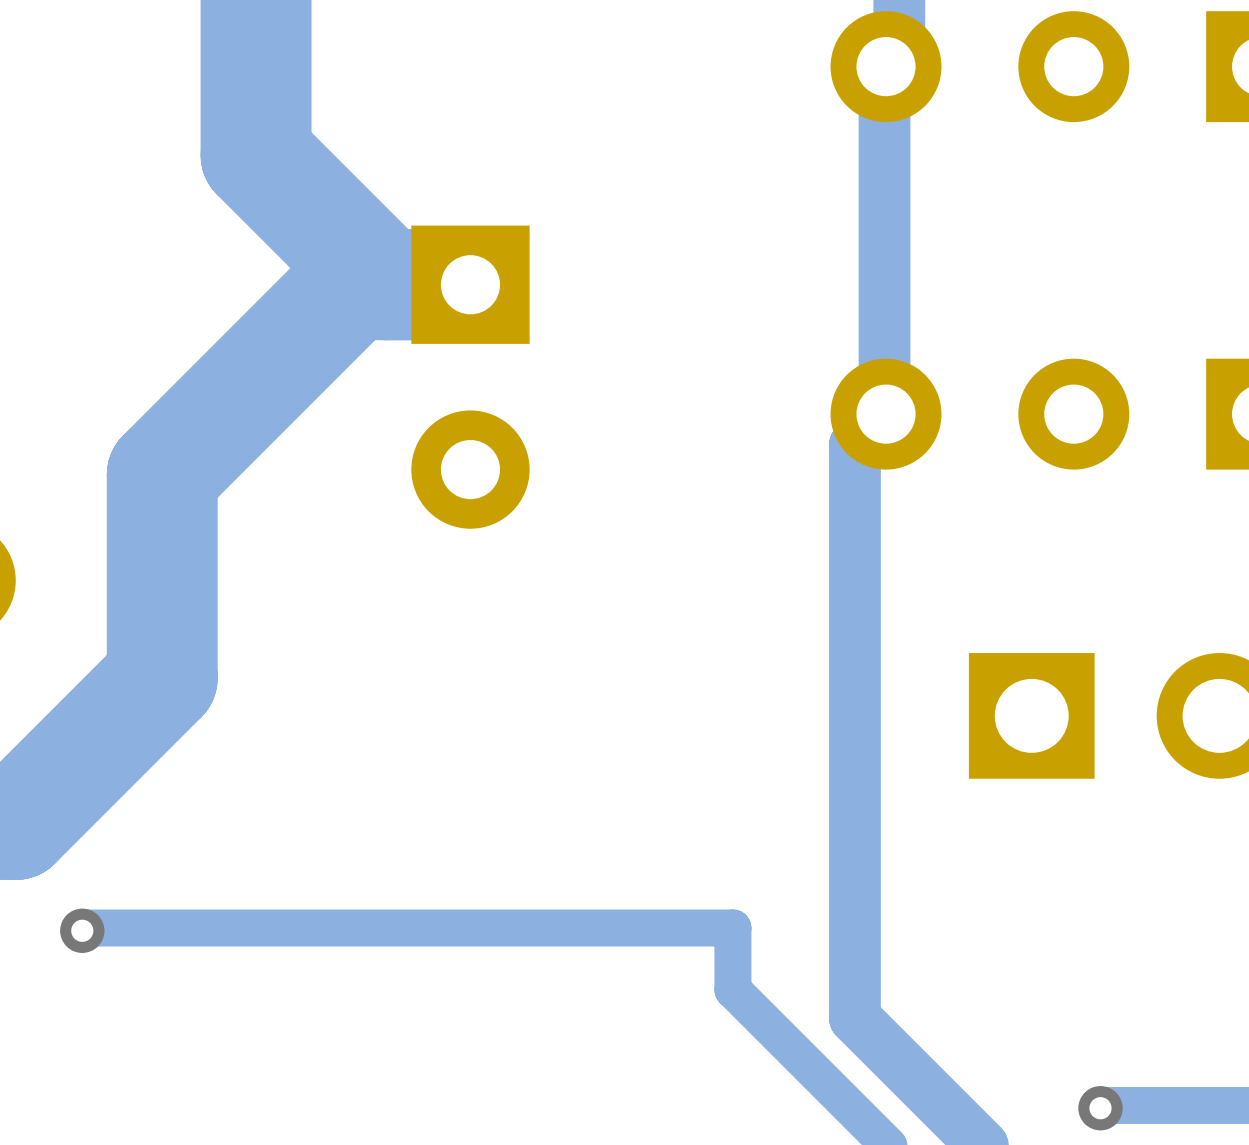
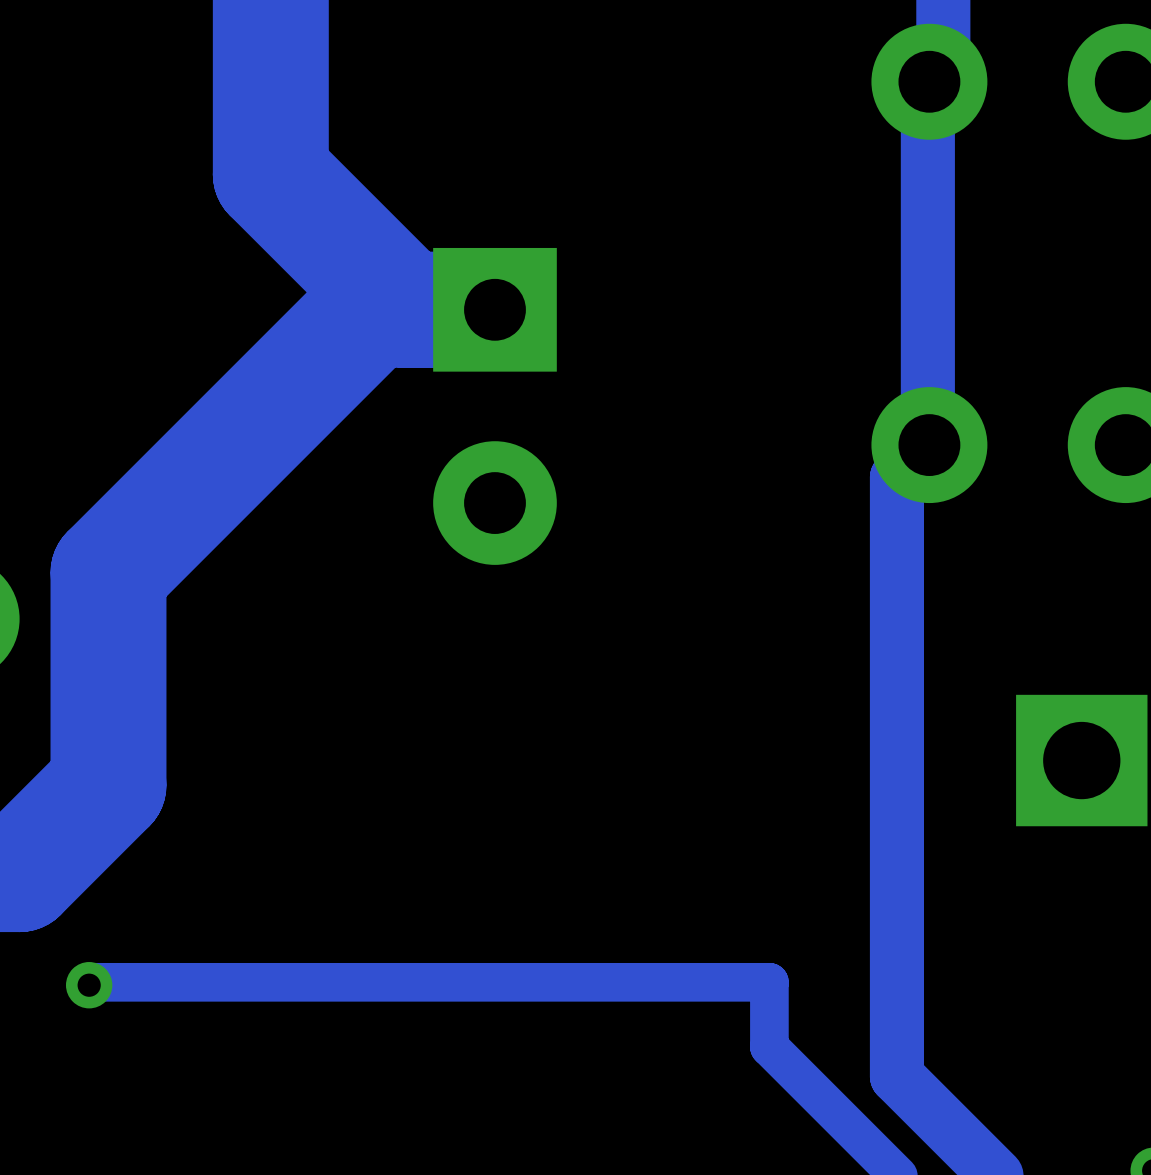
track: (162, 474) (162, 678) (100, 739) -> (172, 508) (108, 572) (108, 785)

